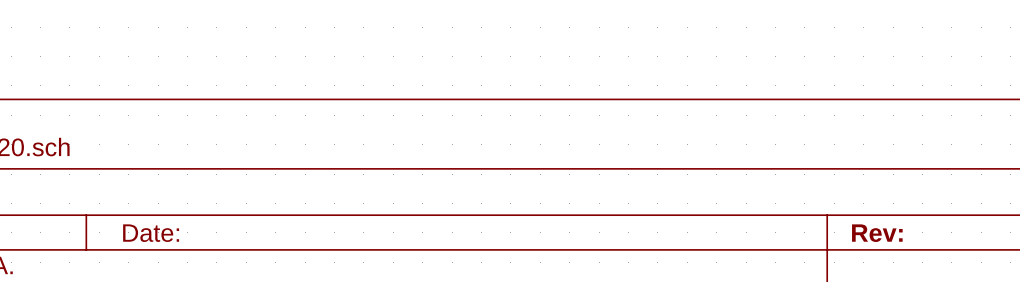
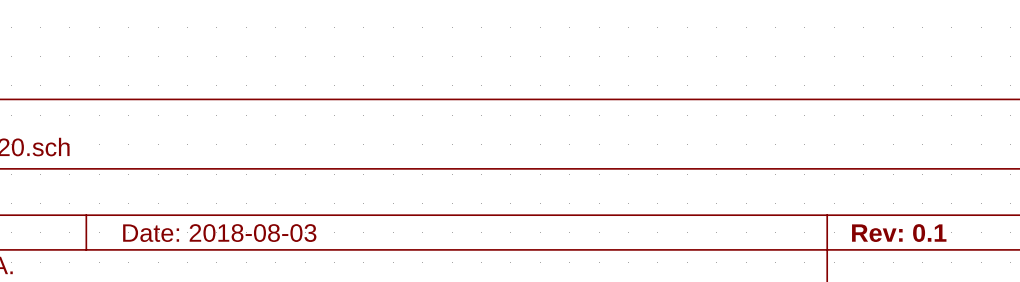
title block: Date: (151, 233) -> Date: 2018-08-03 (219, 233)
title block: Rev: (877, 233) -> Rev: 0.1 (899, 233)

